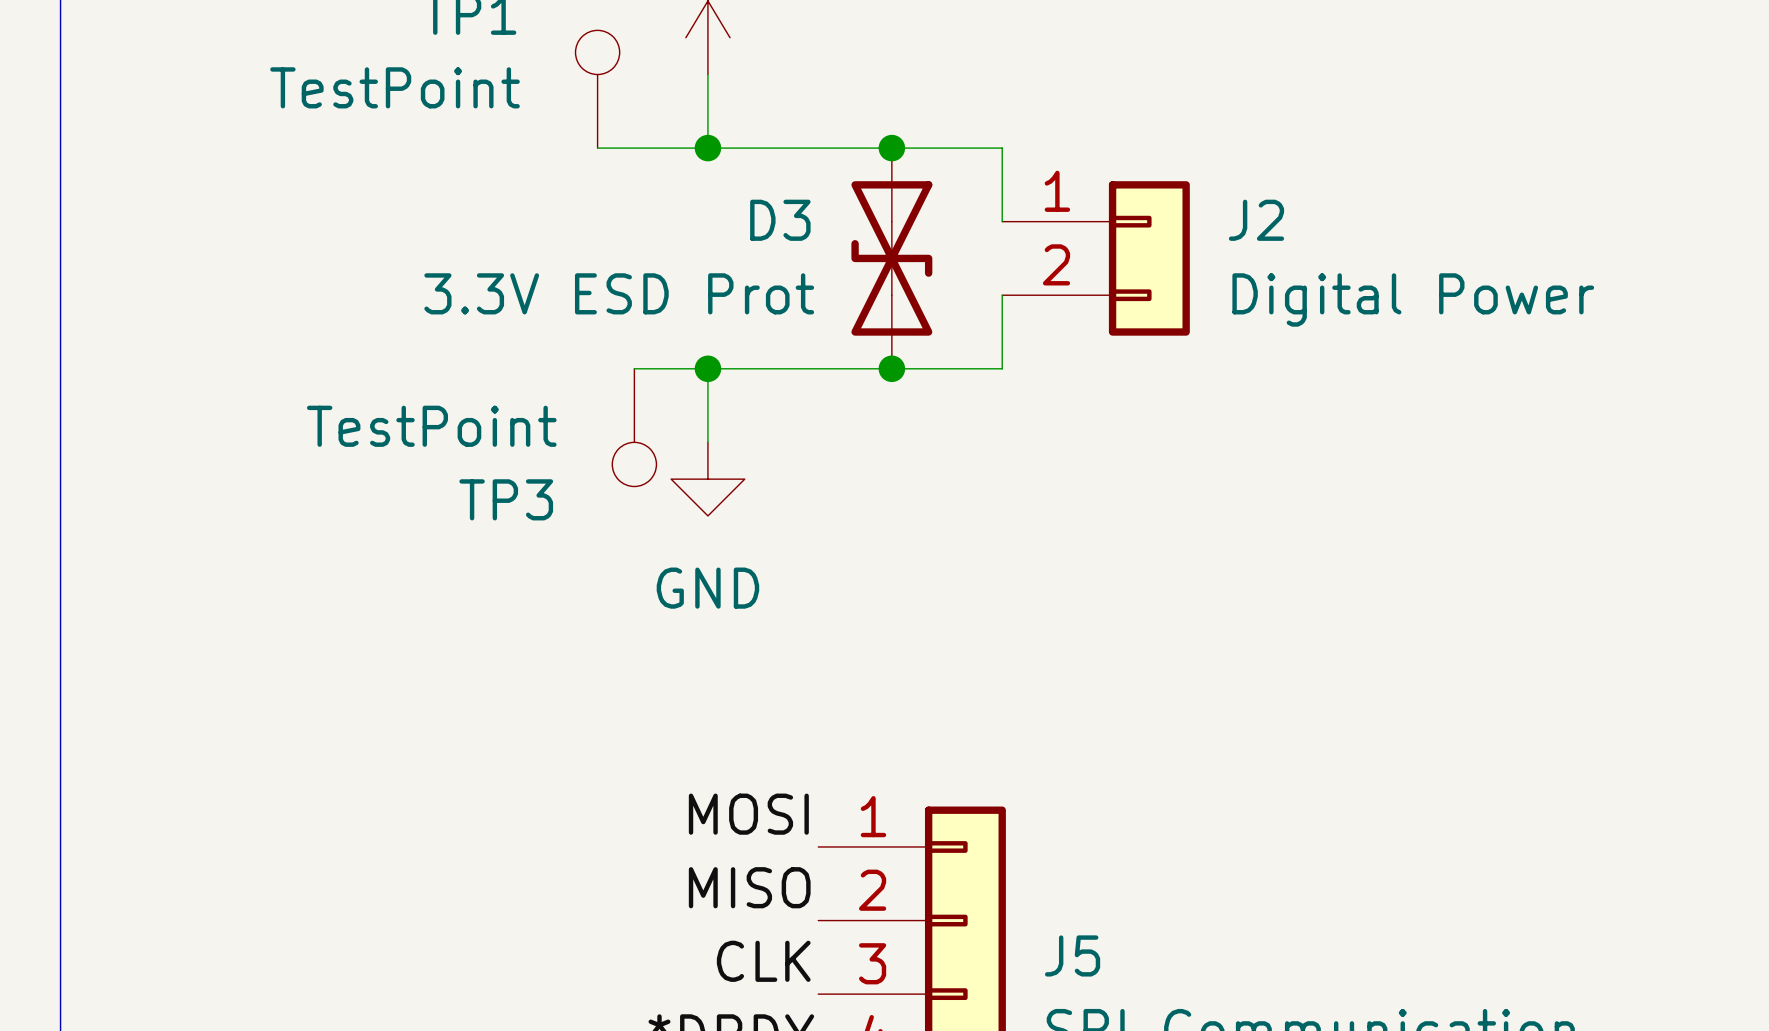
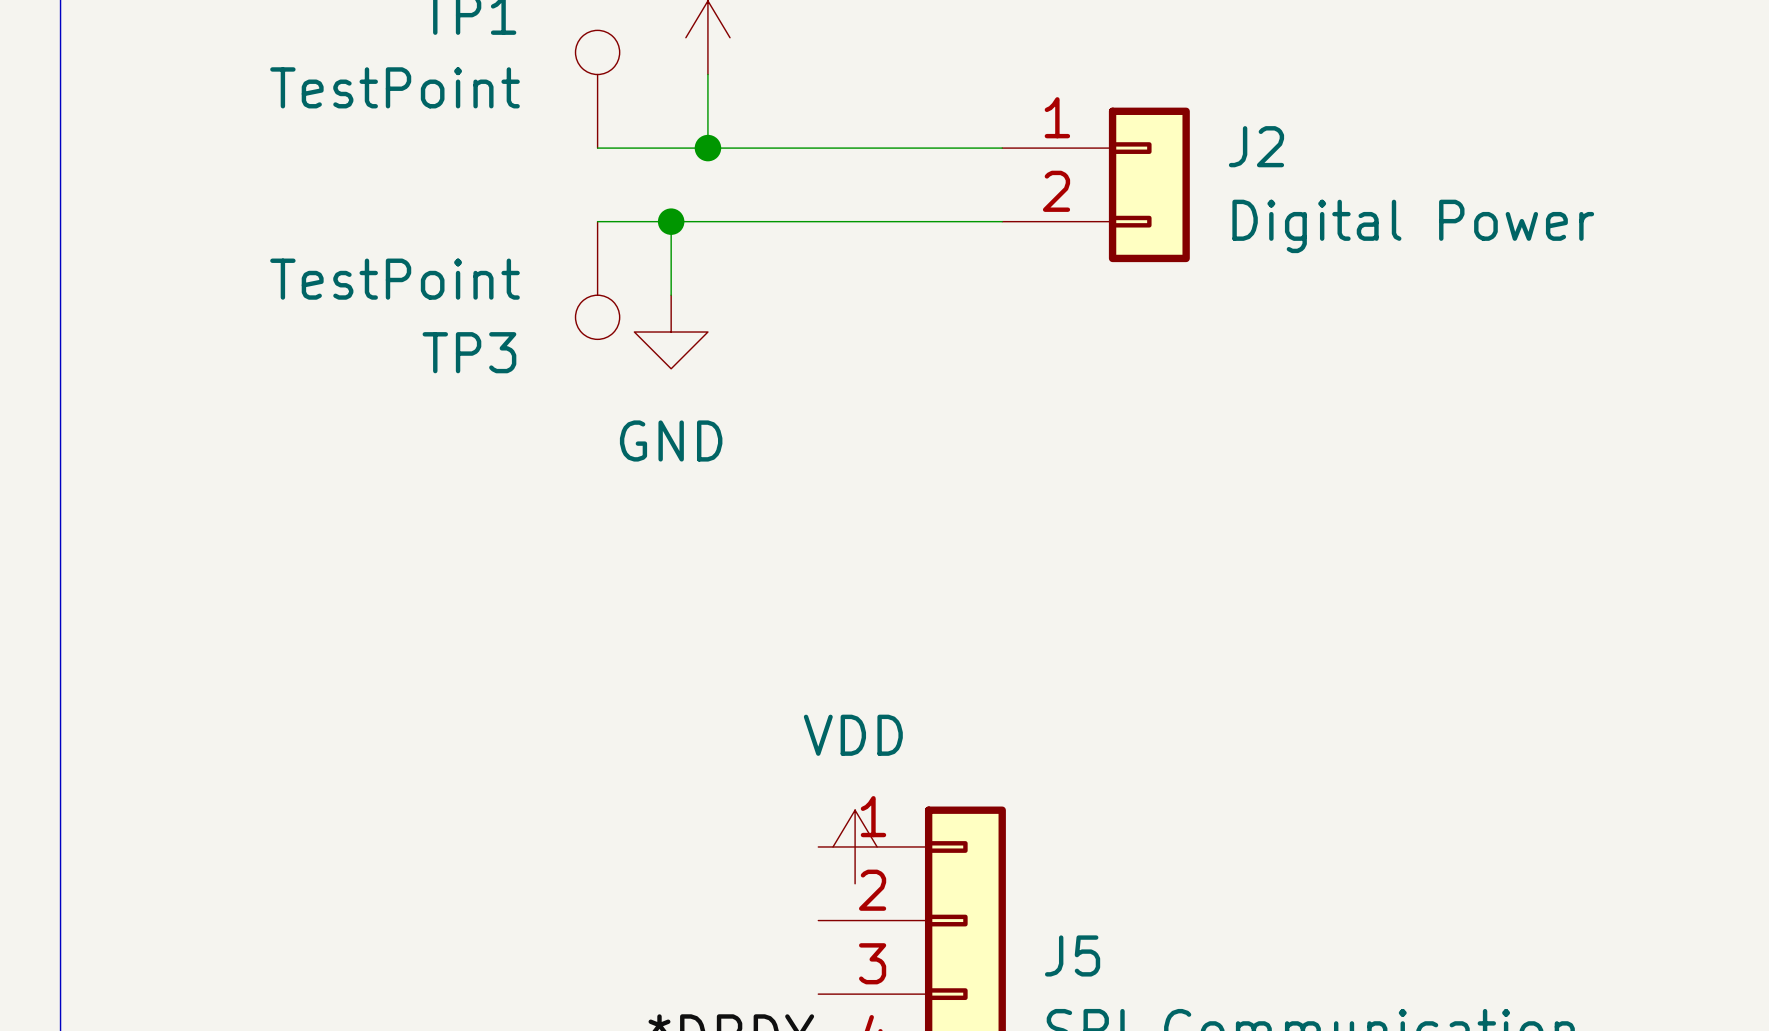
junction: (891, 148) -> none
wire: (1002, 148) (1002, 221) -> (597, 221) (1002, 221)
junction: none -> (671, 221)
D3: 3.3V ESD Prot (891, 258) -> none
J2 position: (1096, 258) -> (1096, 184)
wire: (1002, 295) (1002, 368) (634, 368) -> none
wire: (707, 368) (707, 442) -> (671, 221) (671, 295)
junction: (707, 368) -> none
junction: (891, 368) -> none
TP3 position: (634, 427) -> (597, 280)
power symbol position: GND (707, 479) -> GND (671, 332)
label: MOSI (748, 814) -> none
power symbol: none -> VDD (855, 846)
label: MISO (749, 887) -> none
label: CLK (763, 961) -> none

